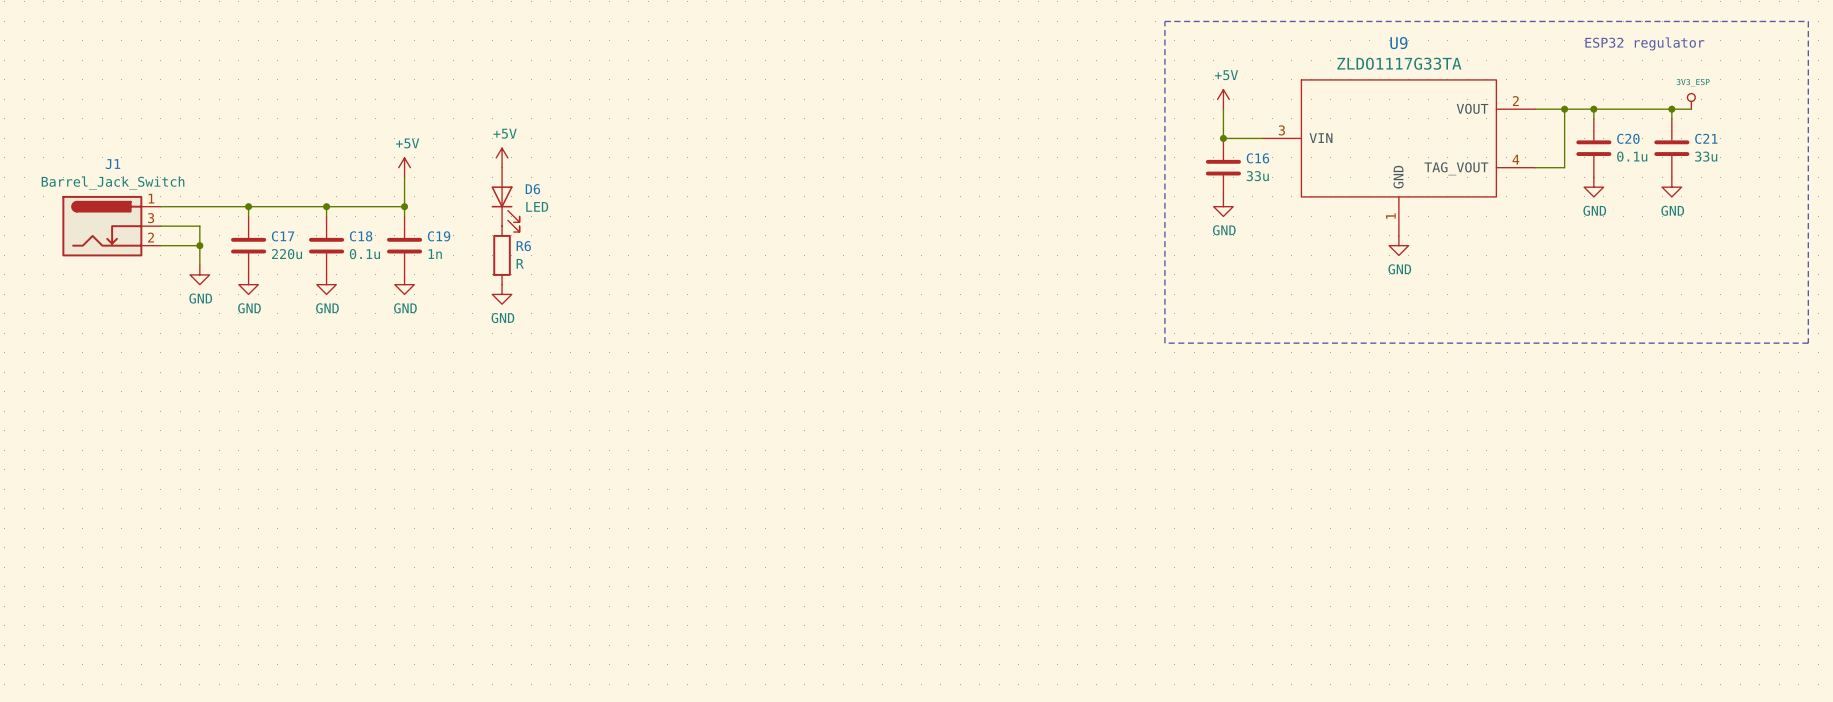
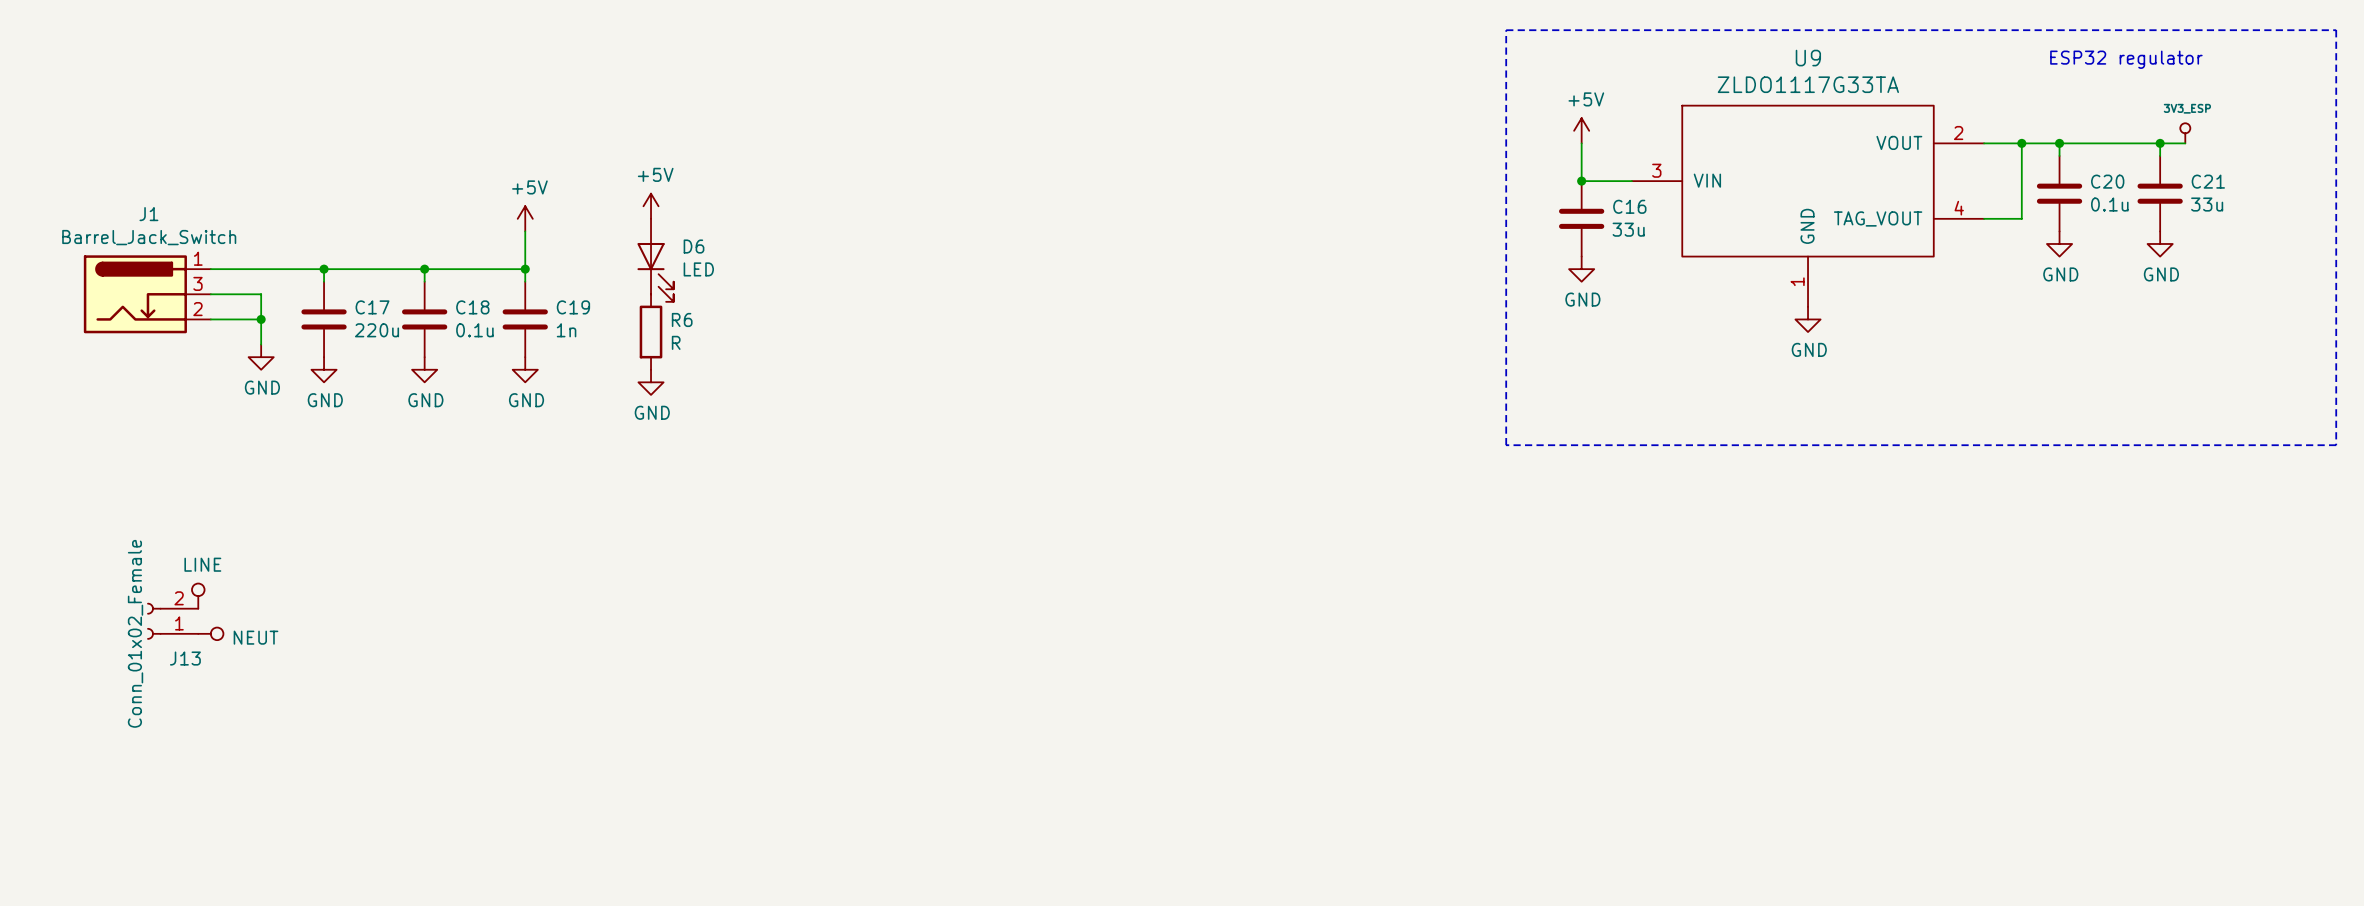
power symbol: none -> LINE (198, 596)
J13: none -> Conn_01x02_Female (172, 621)
power symbol: none -> NEUT (210, 633)

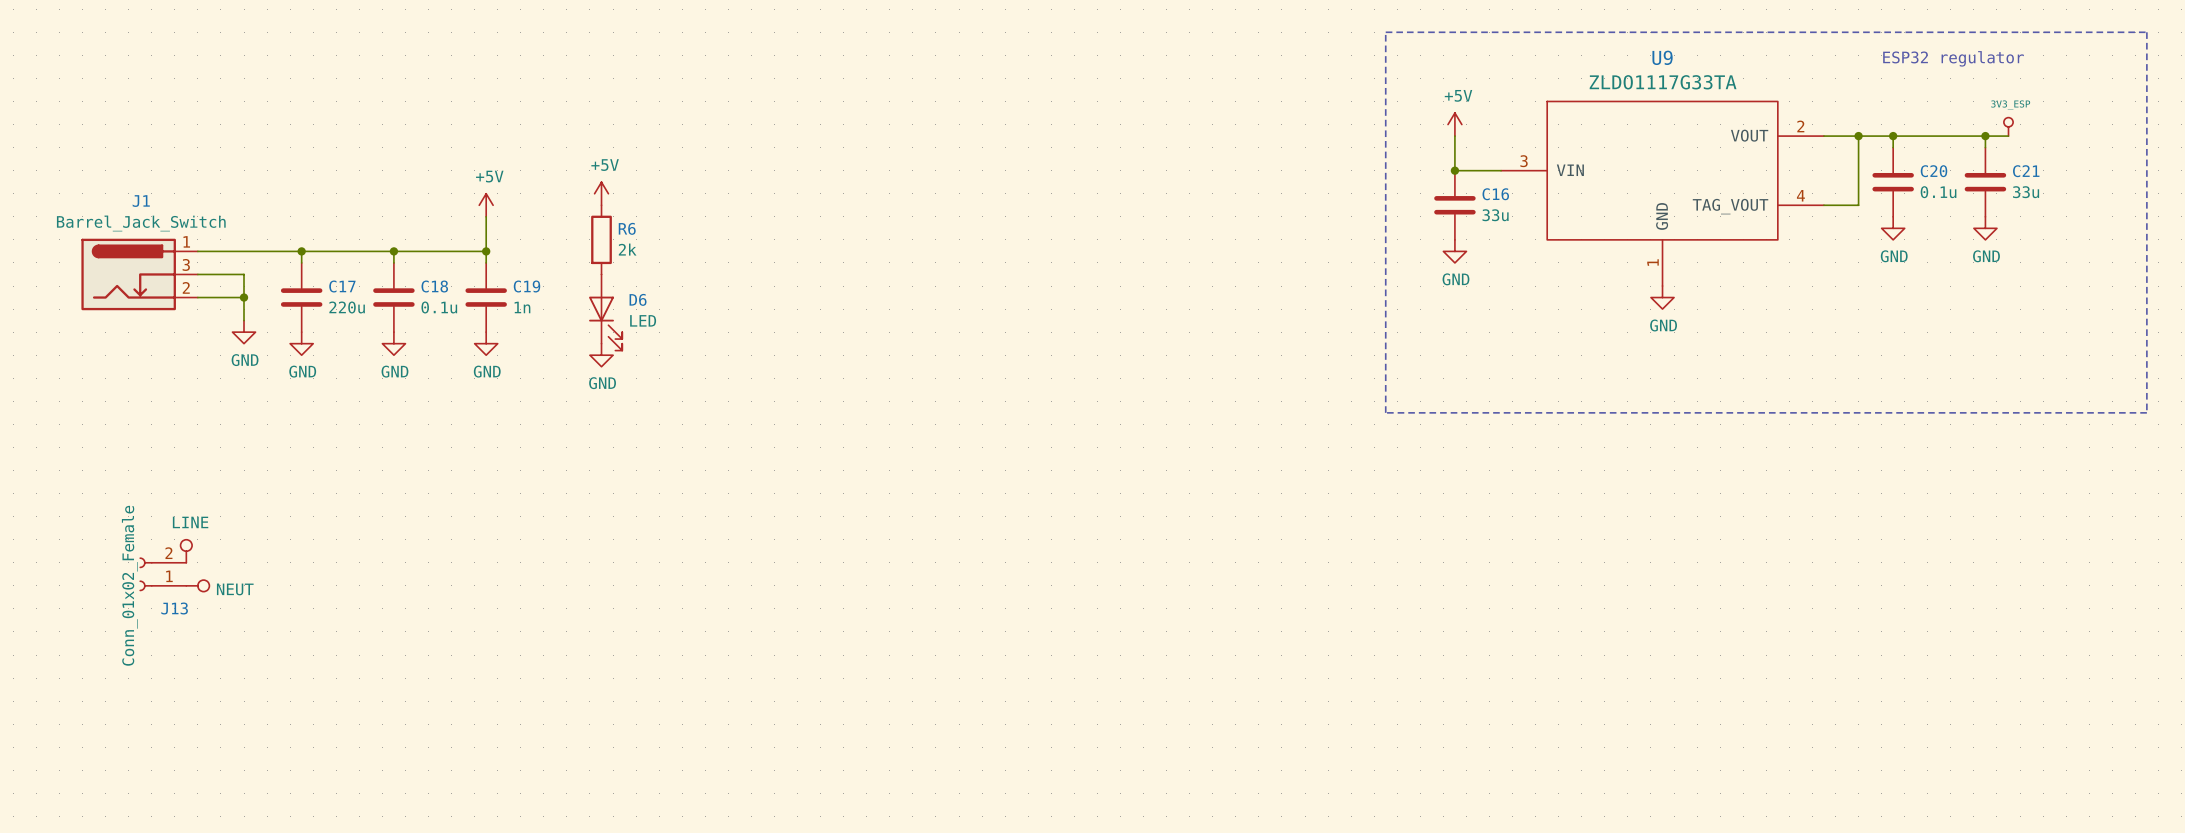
D6 position: (655, 260) -> (605, 312)
R6 position: (651, 332) -> (601, 239)
R6 value: R (676, 342) -> 2k (627, 249)

